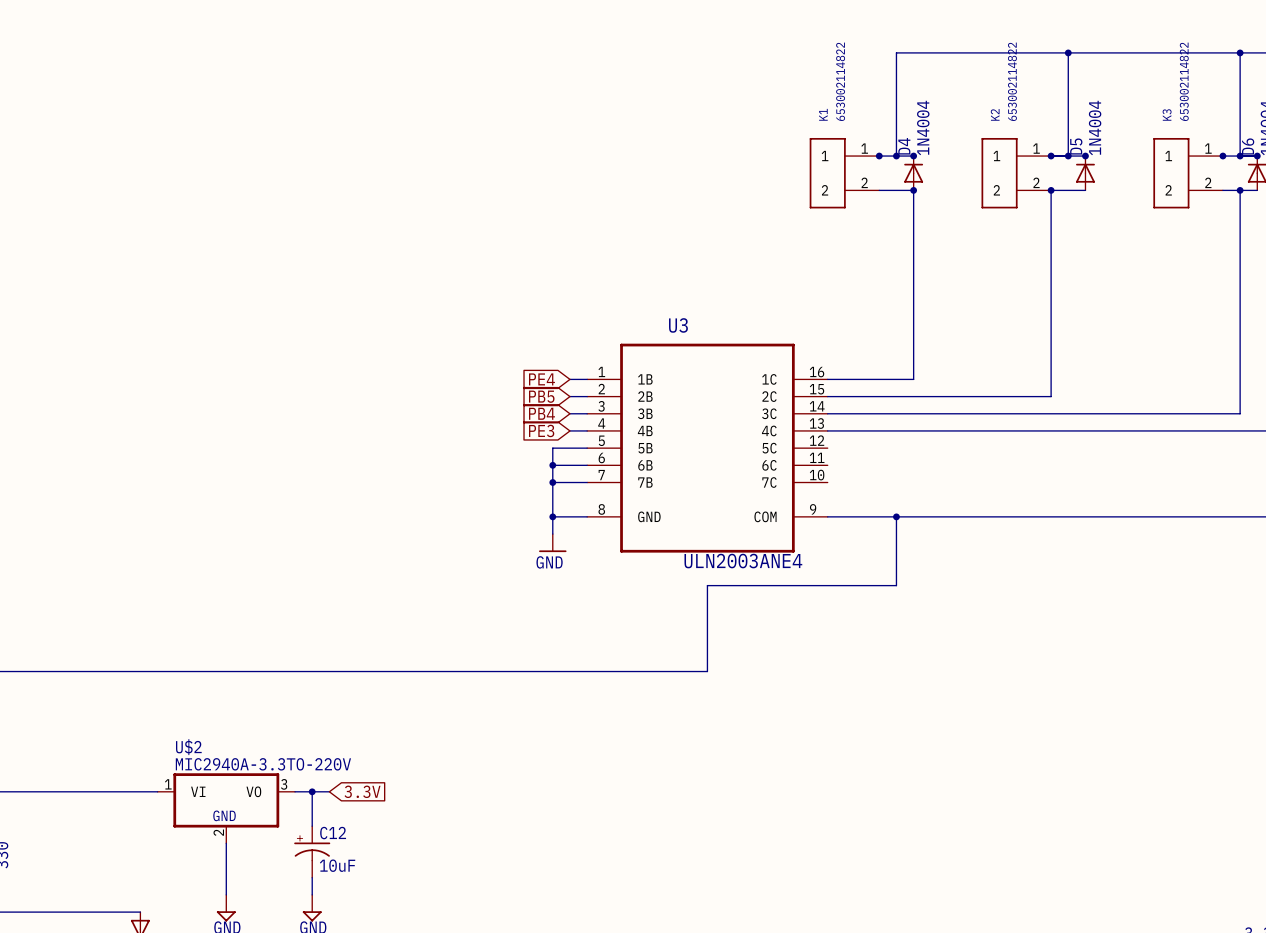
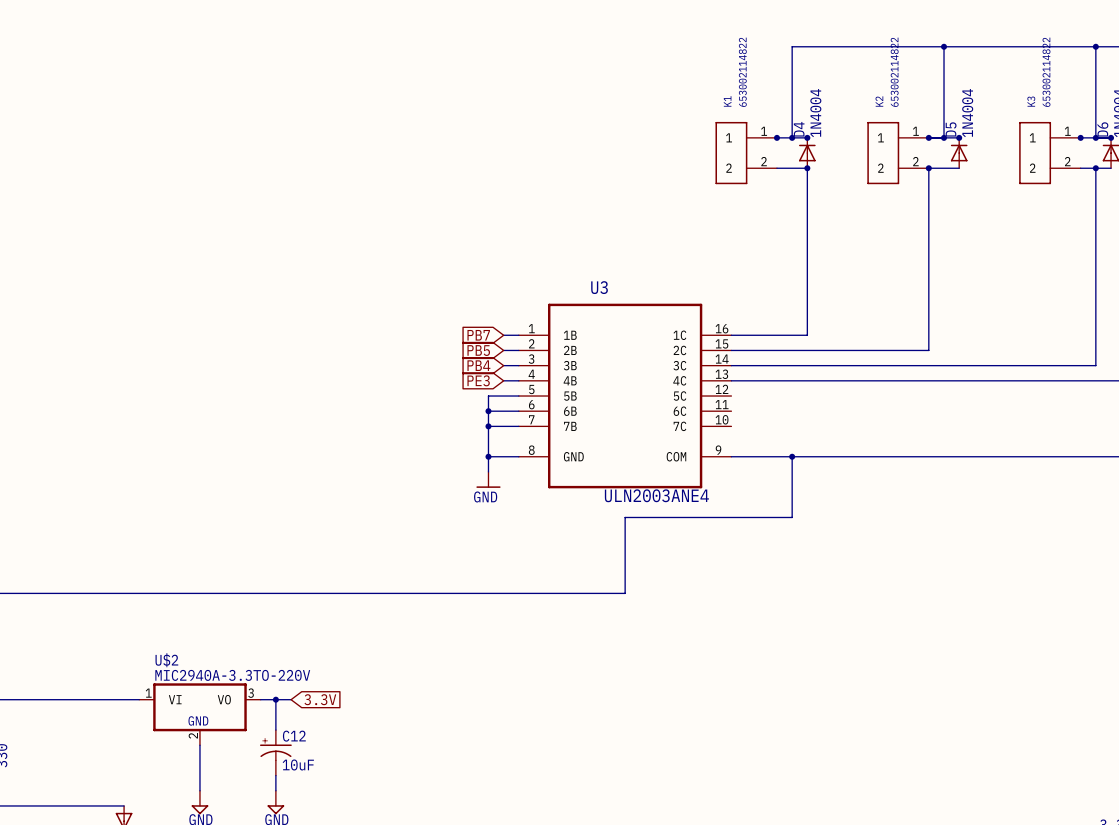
global label: PE4 (541, 379) -> PB7 (478, 335)

